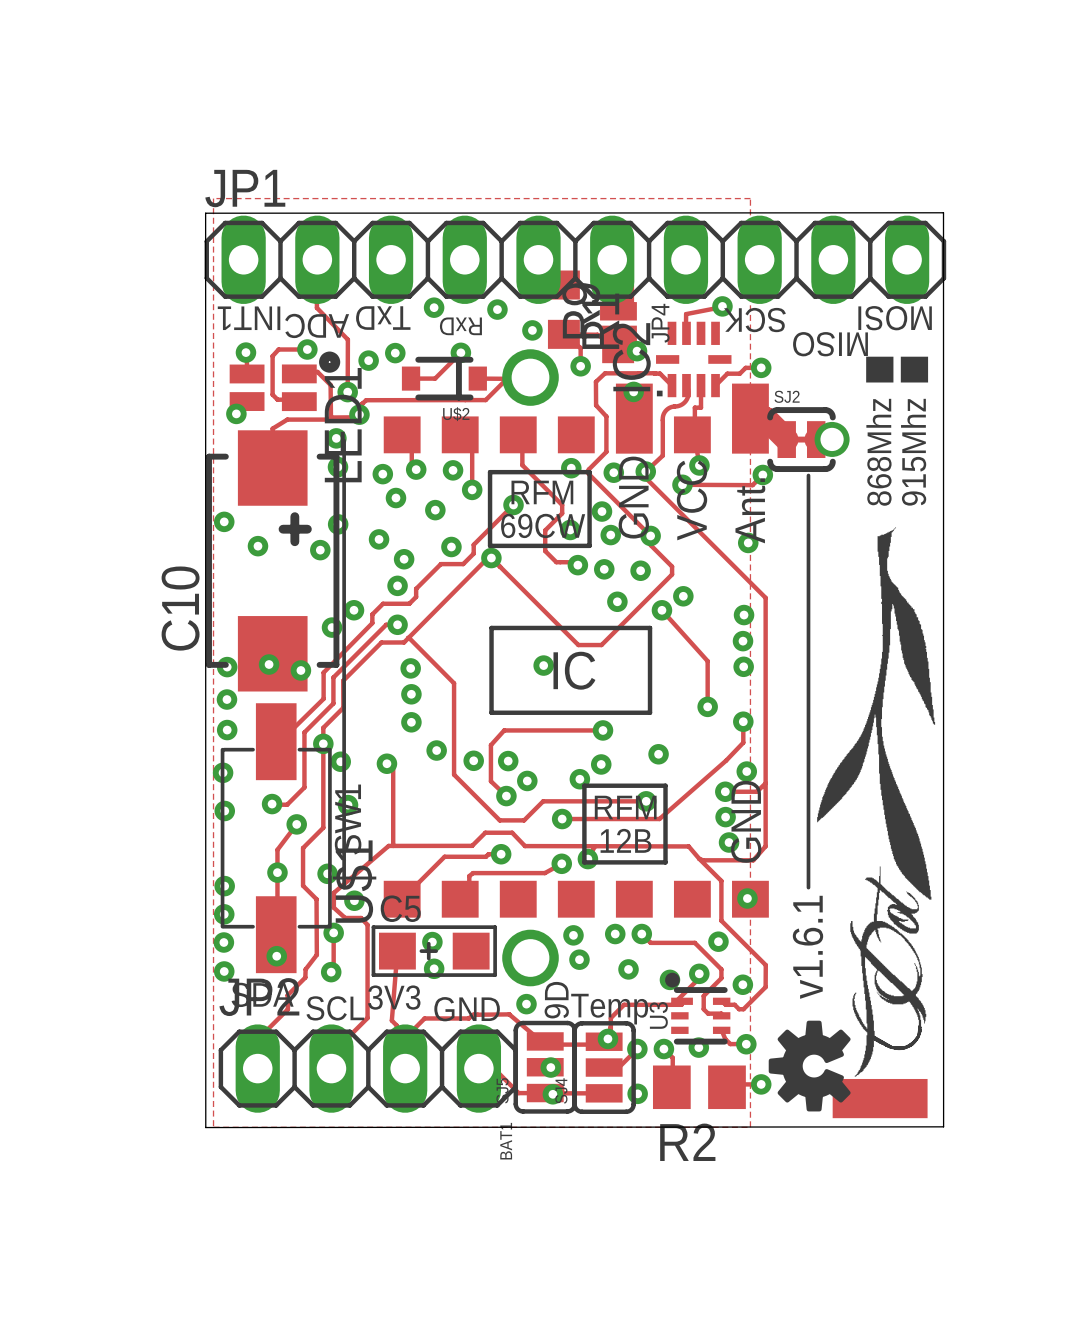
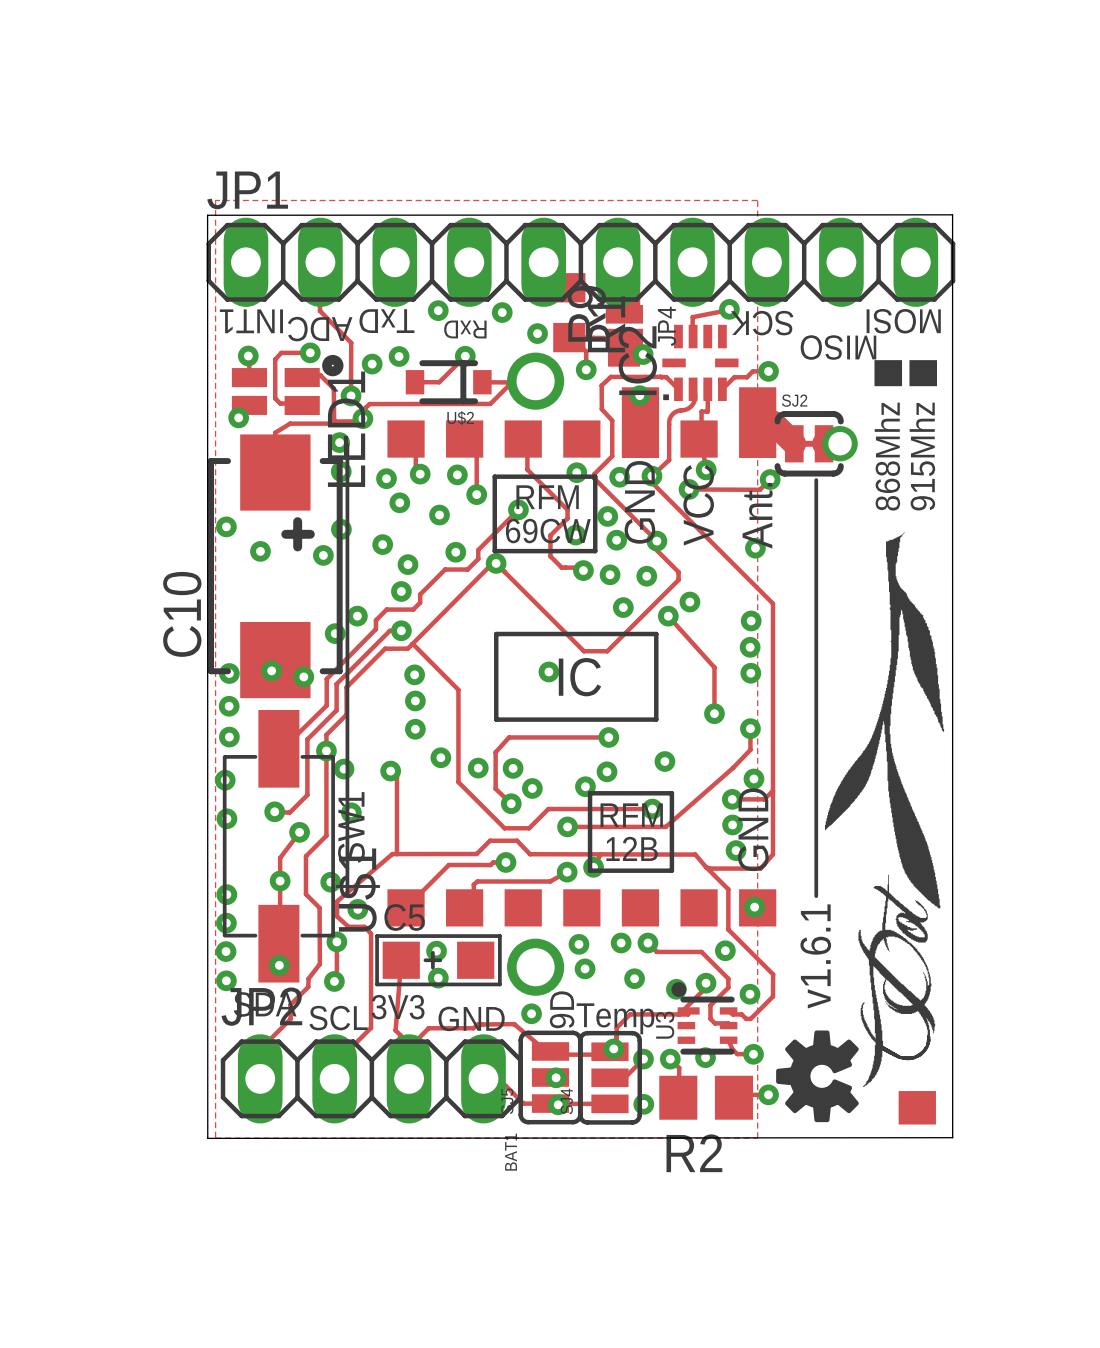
drawing shape: [832, 1078, 928, 1119] -> [898, 1091, 936, 1125]

